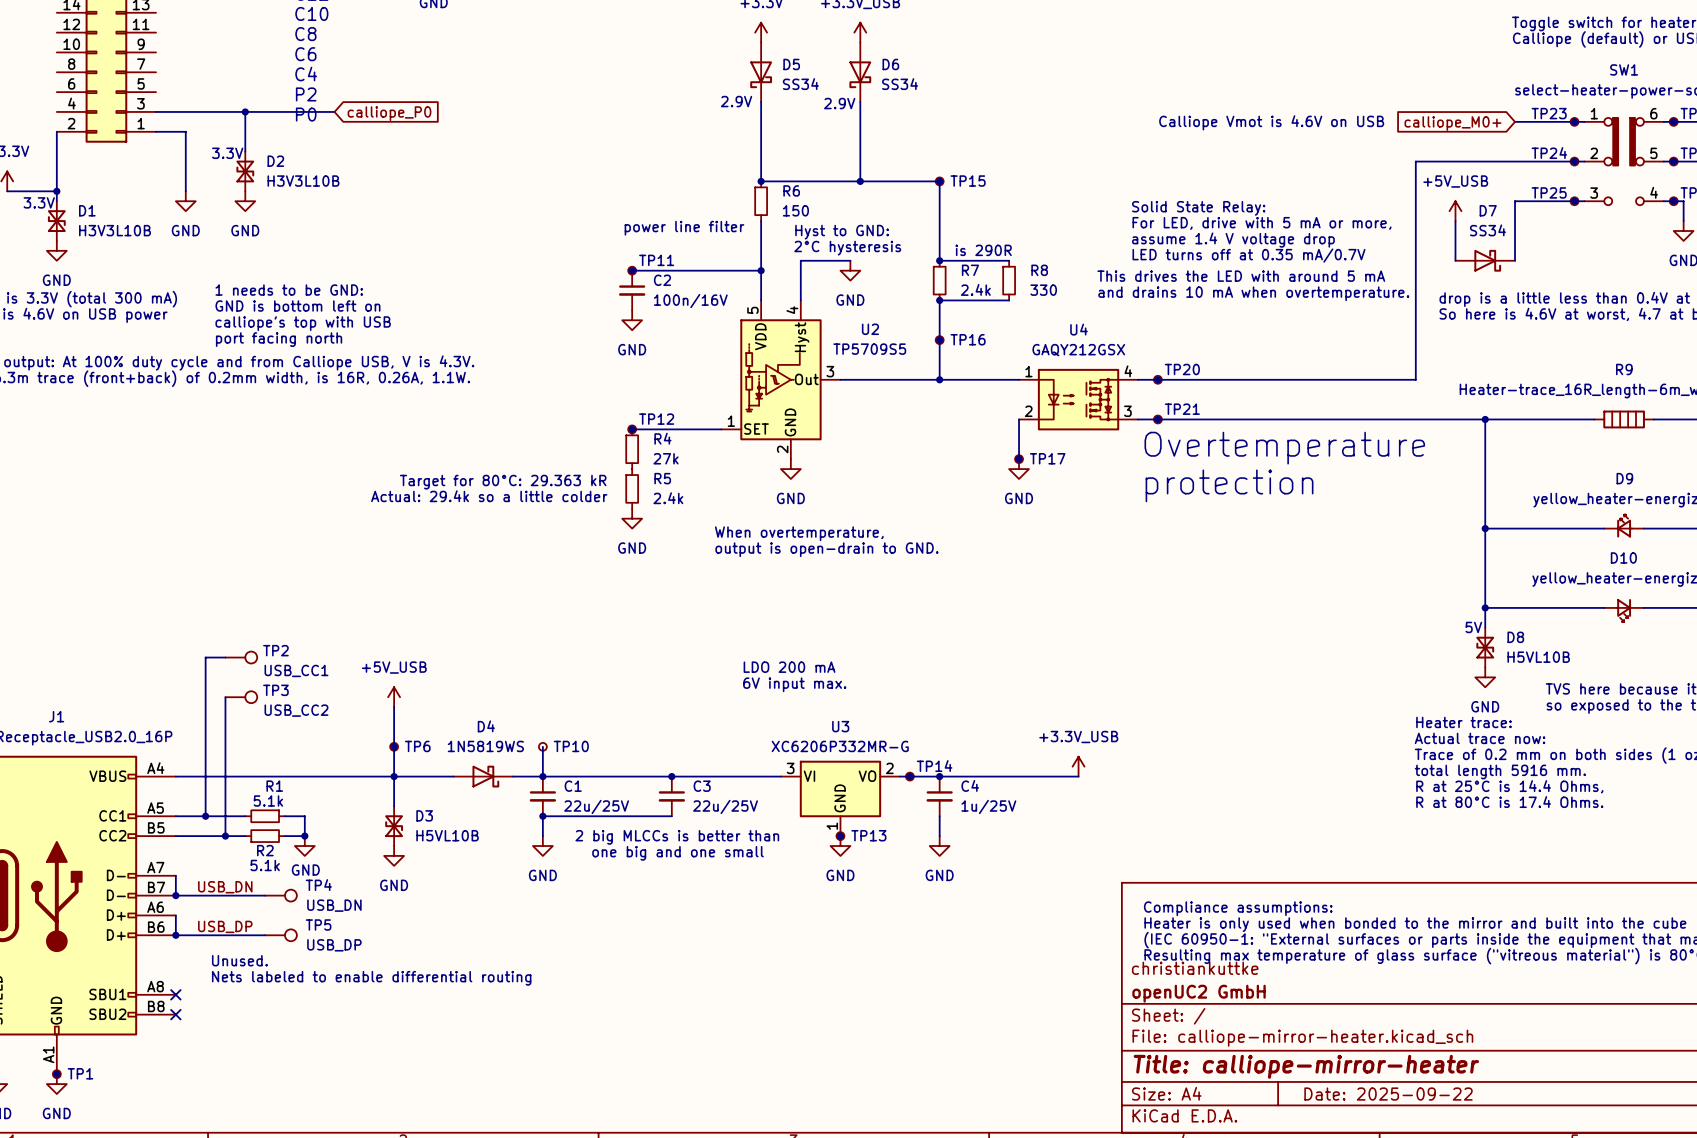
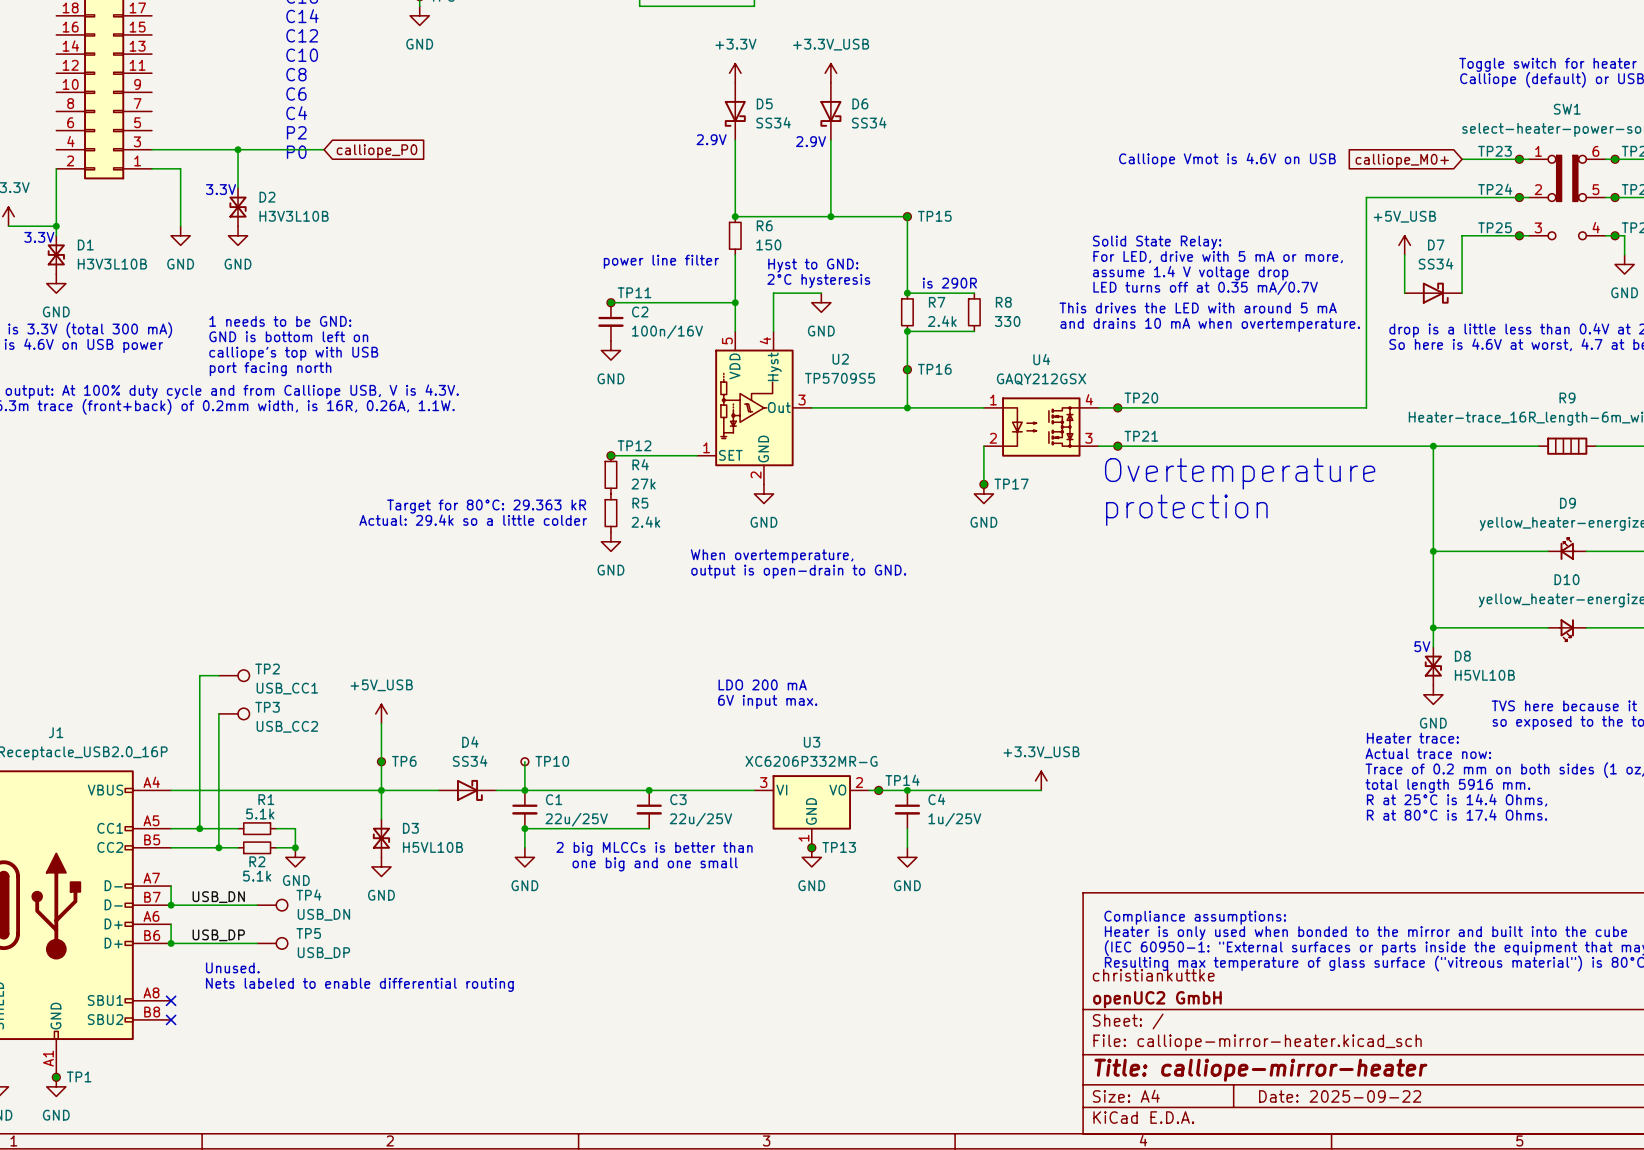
D4 value: 1N5819WS (485, 746) -> SS34 (470, 761)

